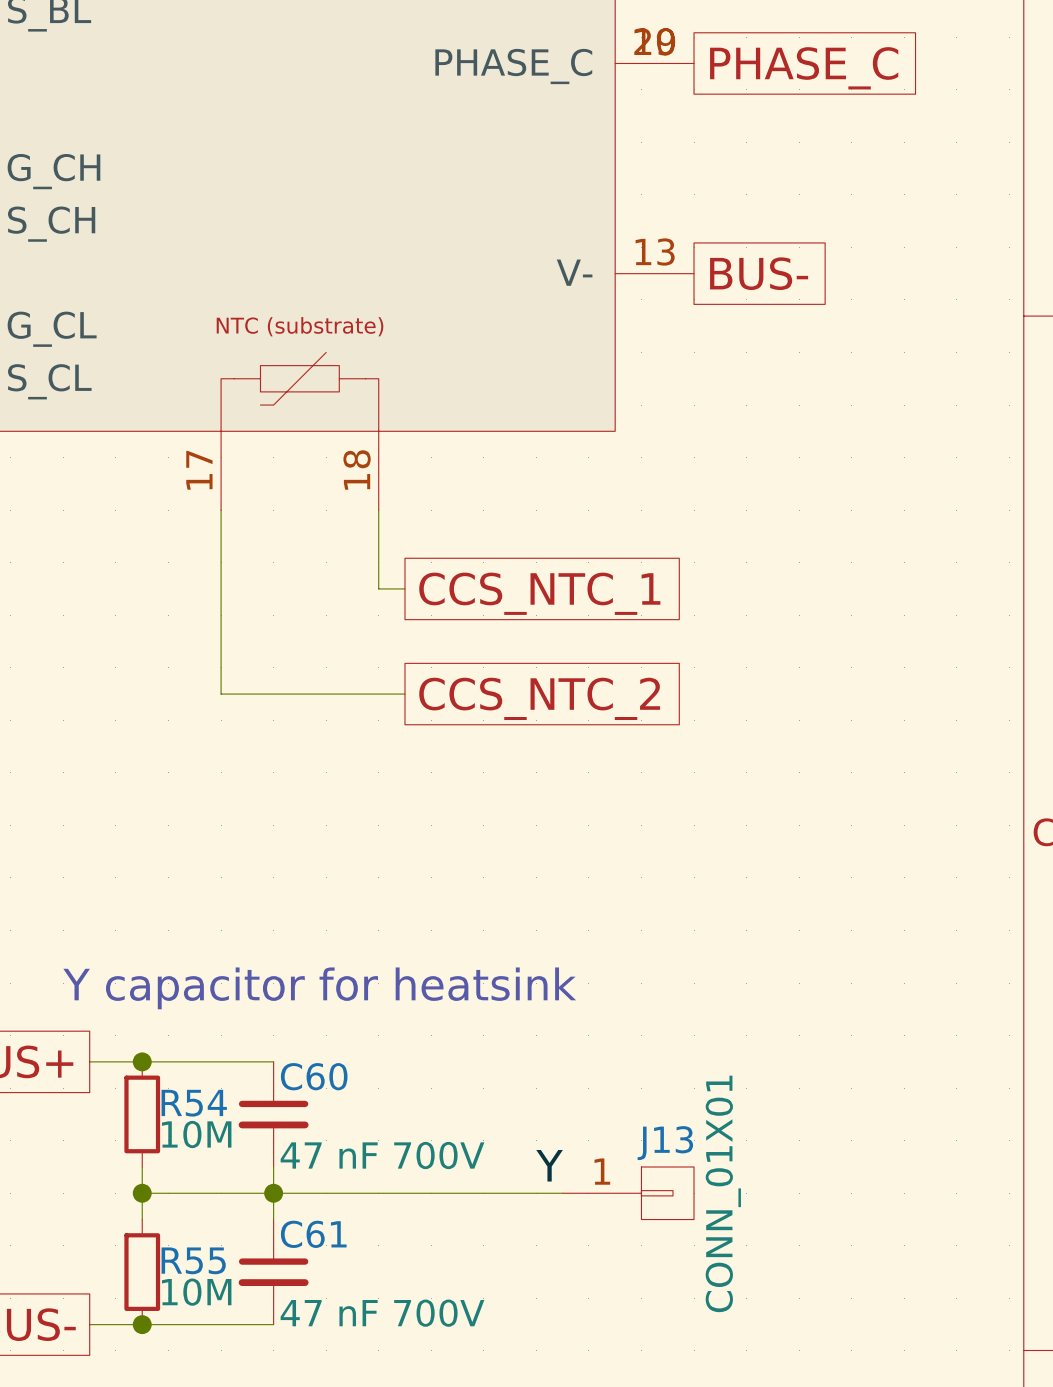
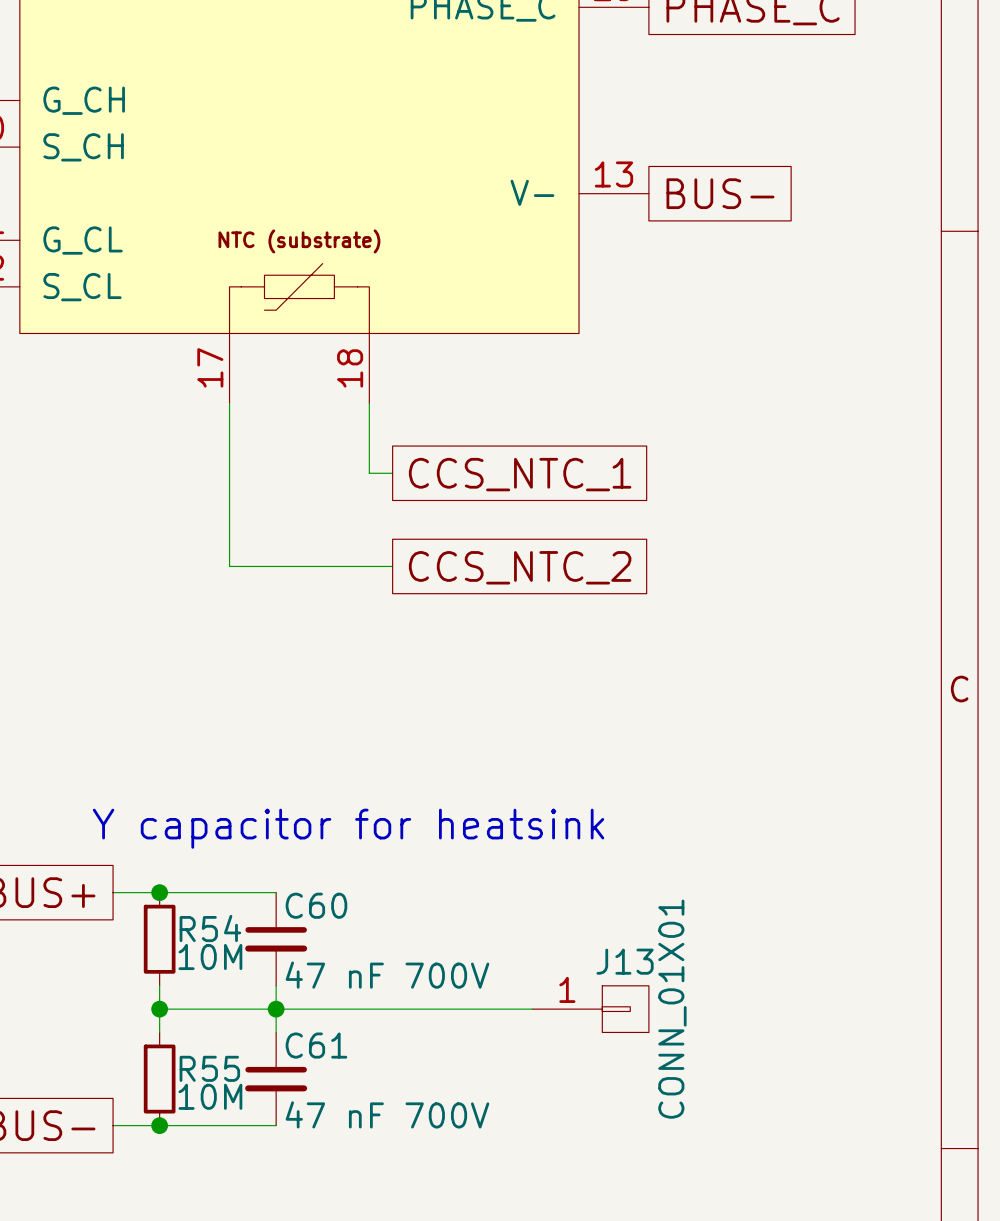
label: Y (549, 1165) -> none

